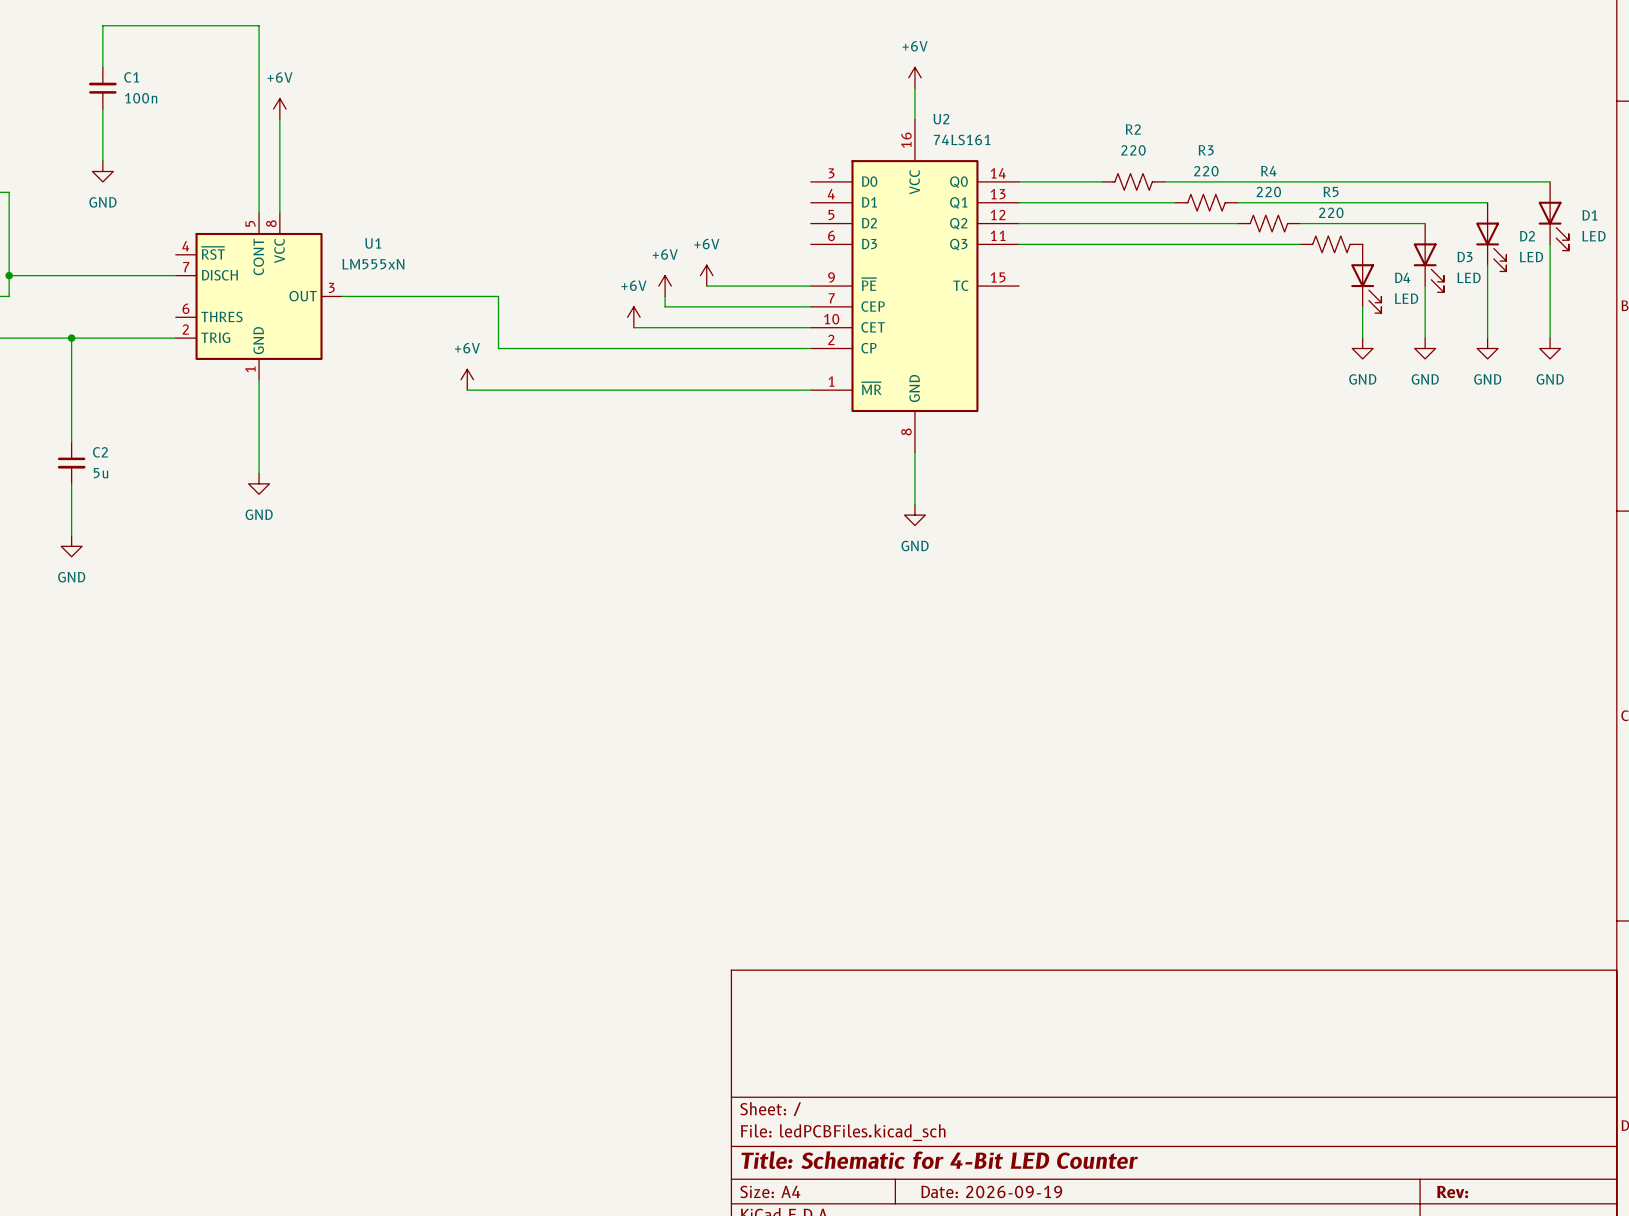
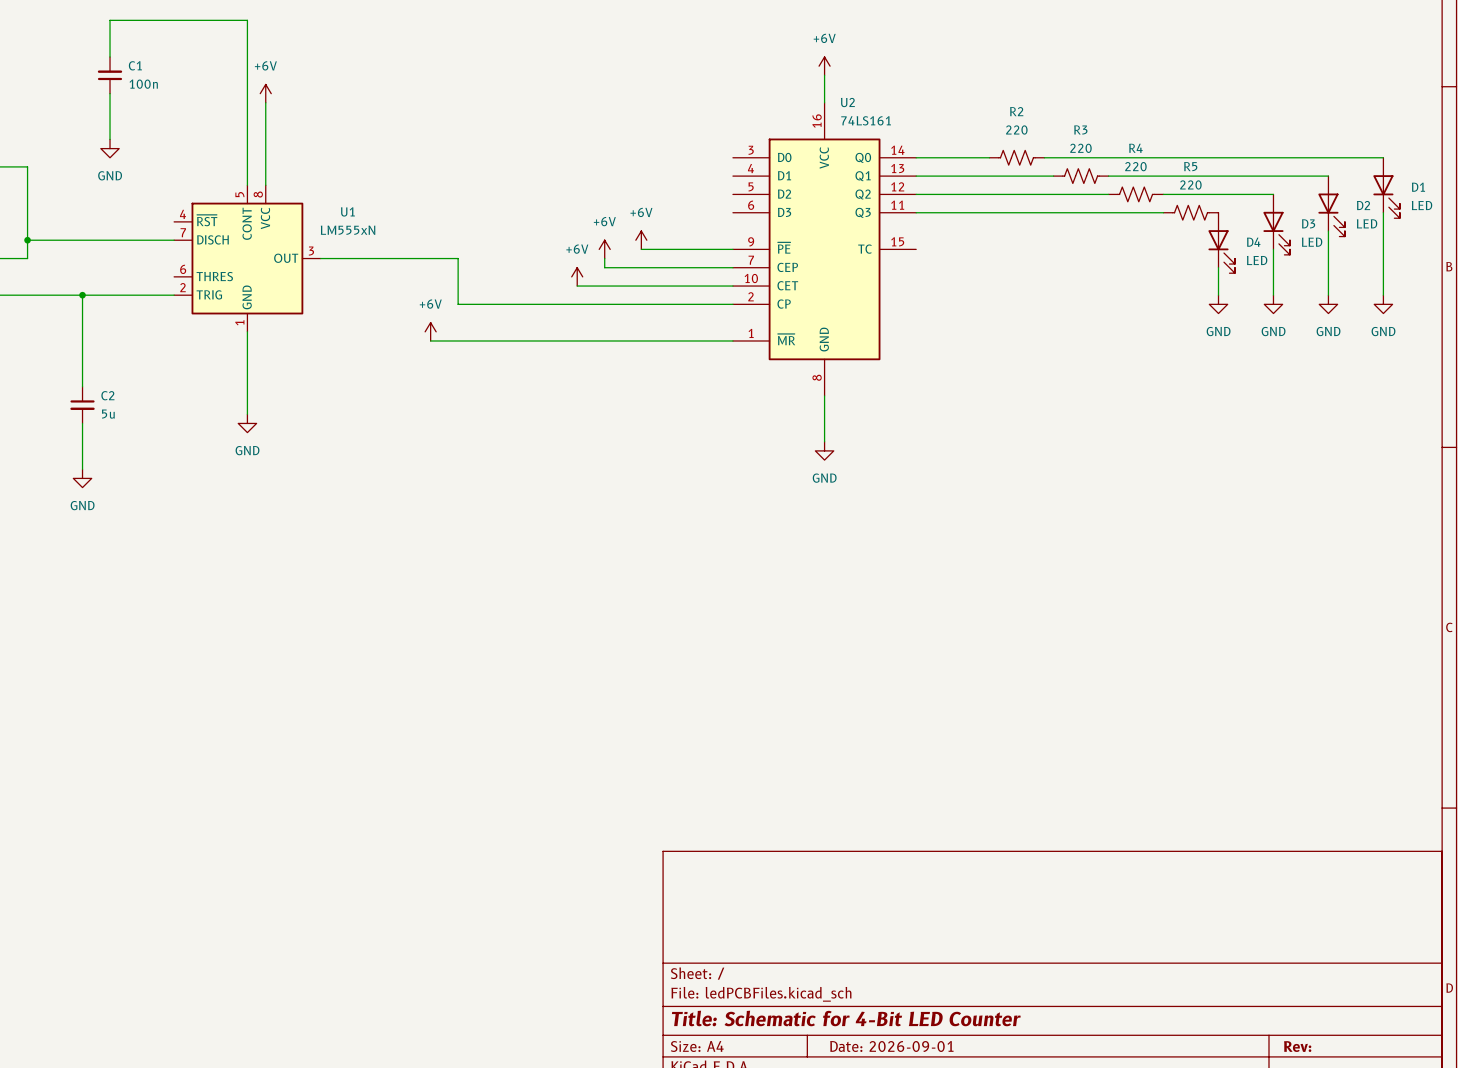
title block: Date: 2026-09-19 (991, 1191) -> Date: 2026-09-01 (891, 1046)

